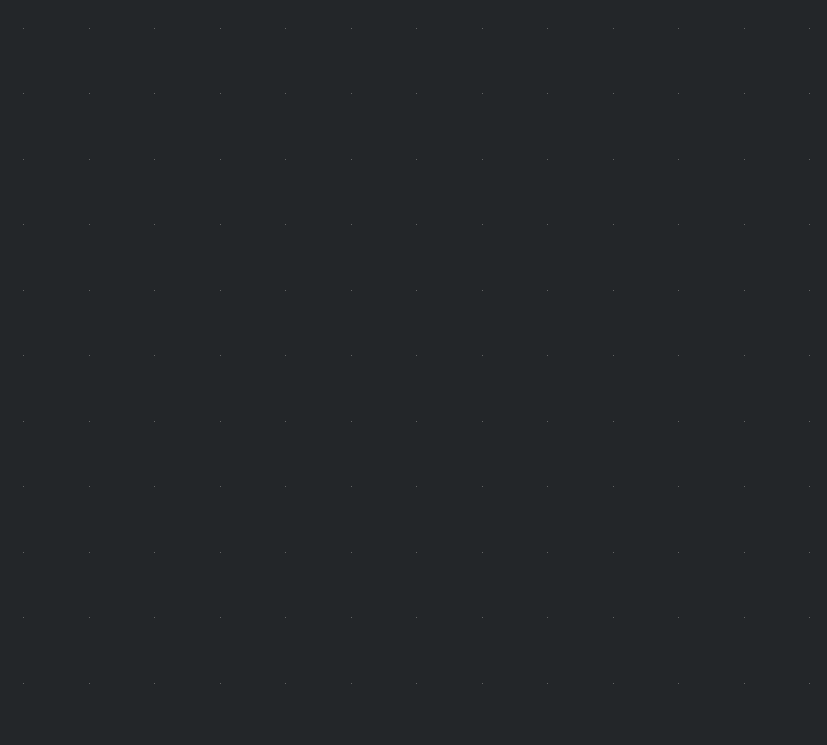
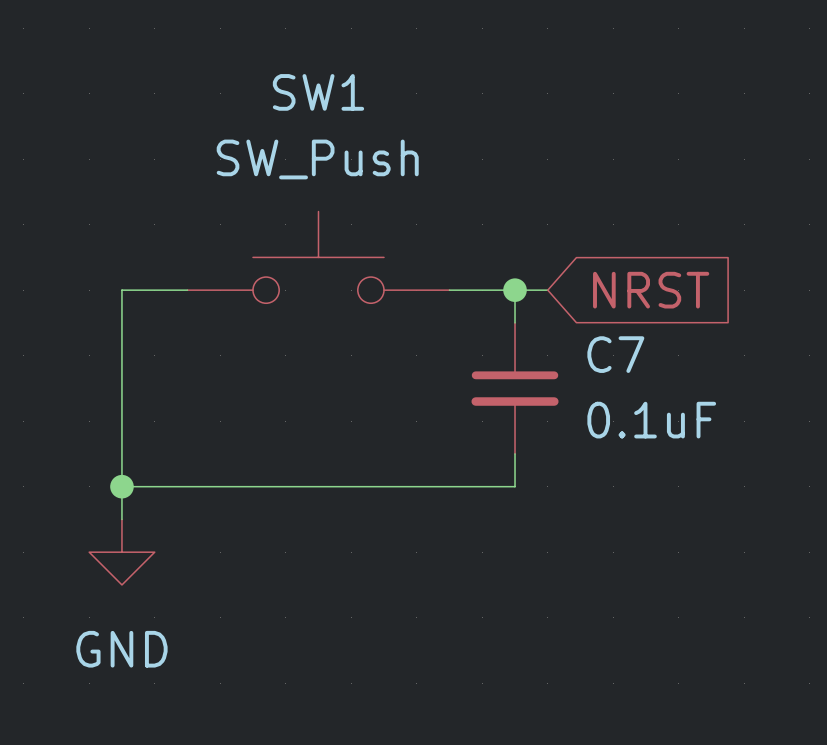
SW1: none -> SW_Push (318, 257)
wire: none -> (187, 290) (121, 290) (121, 519)
wire: none -> (449, 290) (547, 290)
wire: none -> (515, 290) (515, 322)
junction: none -> (515, 290)
global label: none -> NRST (651, 290)
C7: none -> 0.1uF (515, 388)
wire: none -> (515, 453) (515, 486) (121, 486)
junction: none -> (121, 486)
power symbol: none -> GND (121, 552)

